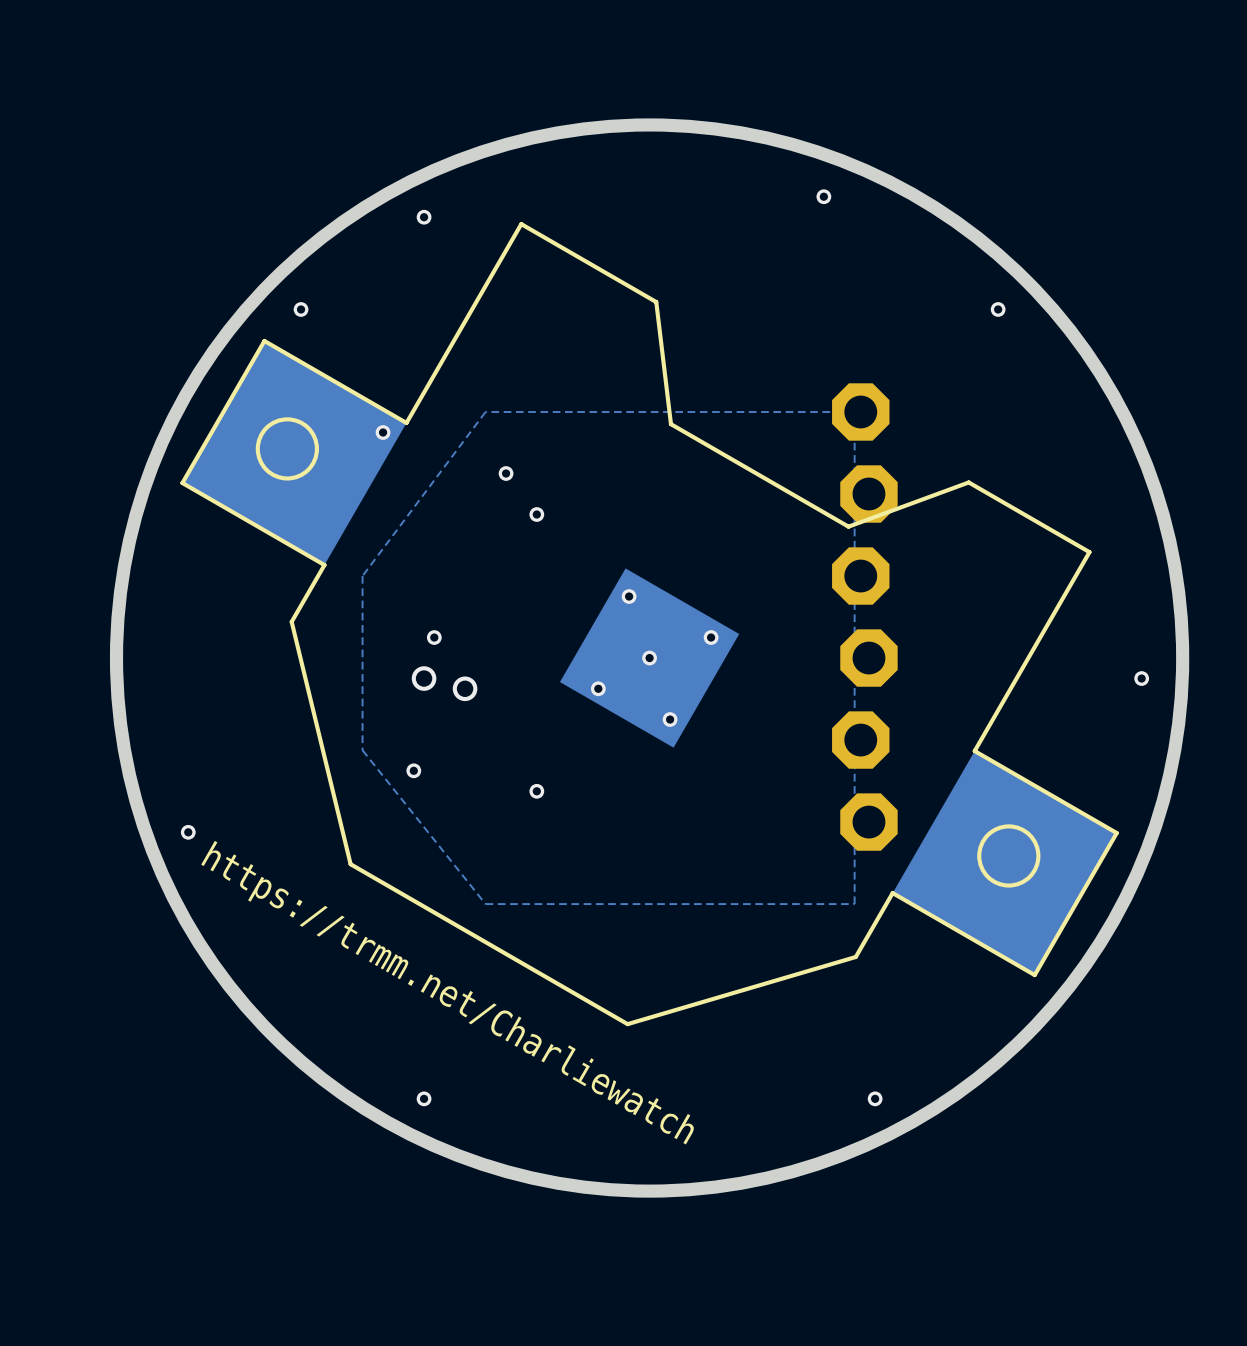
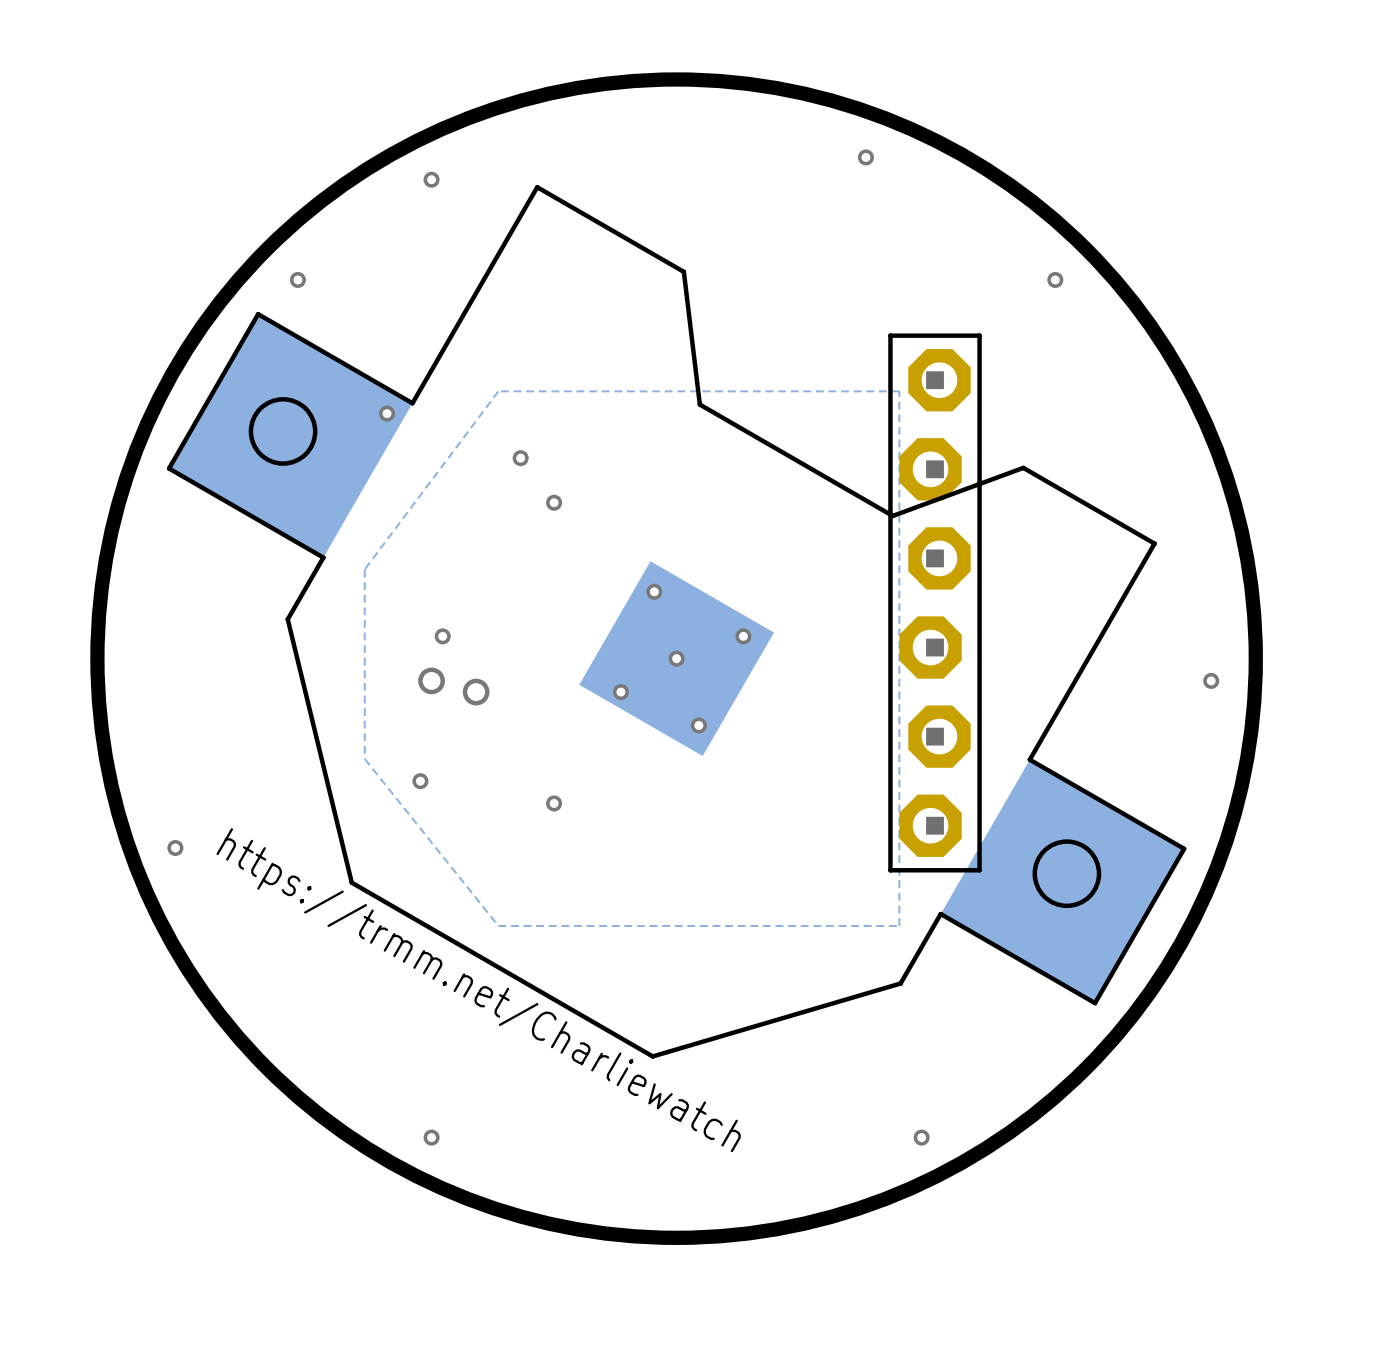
part side: top (864, 617) -> bottom (935, 602)
text position: https://trmm.net/Charliewatch (447, 992) -> https://trmm.net/Charliewatch (478, 990)

